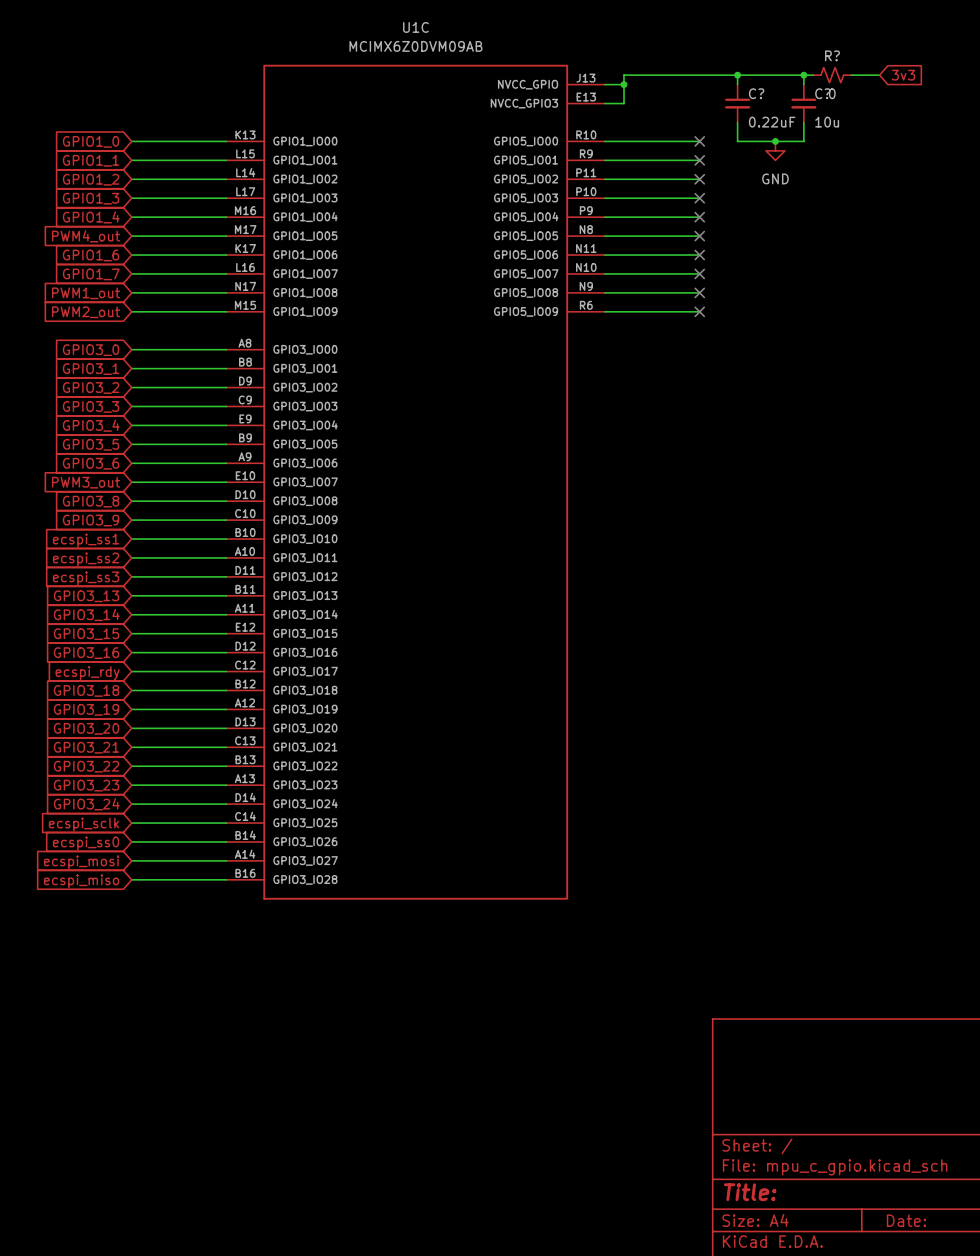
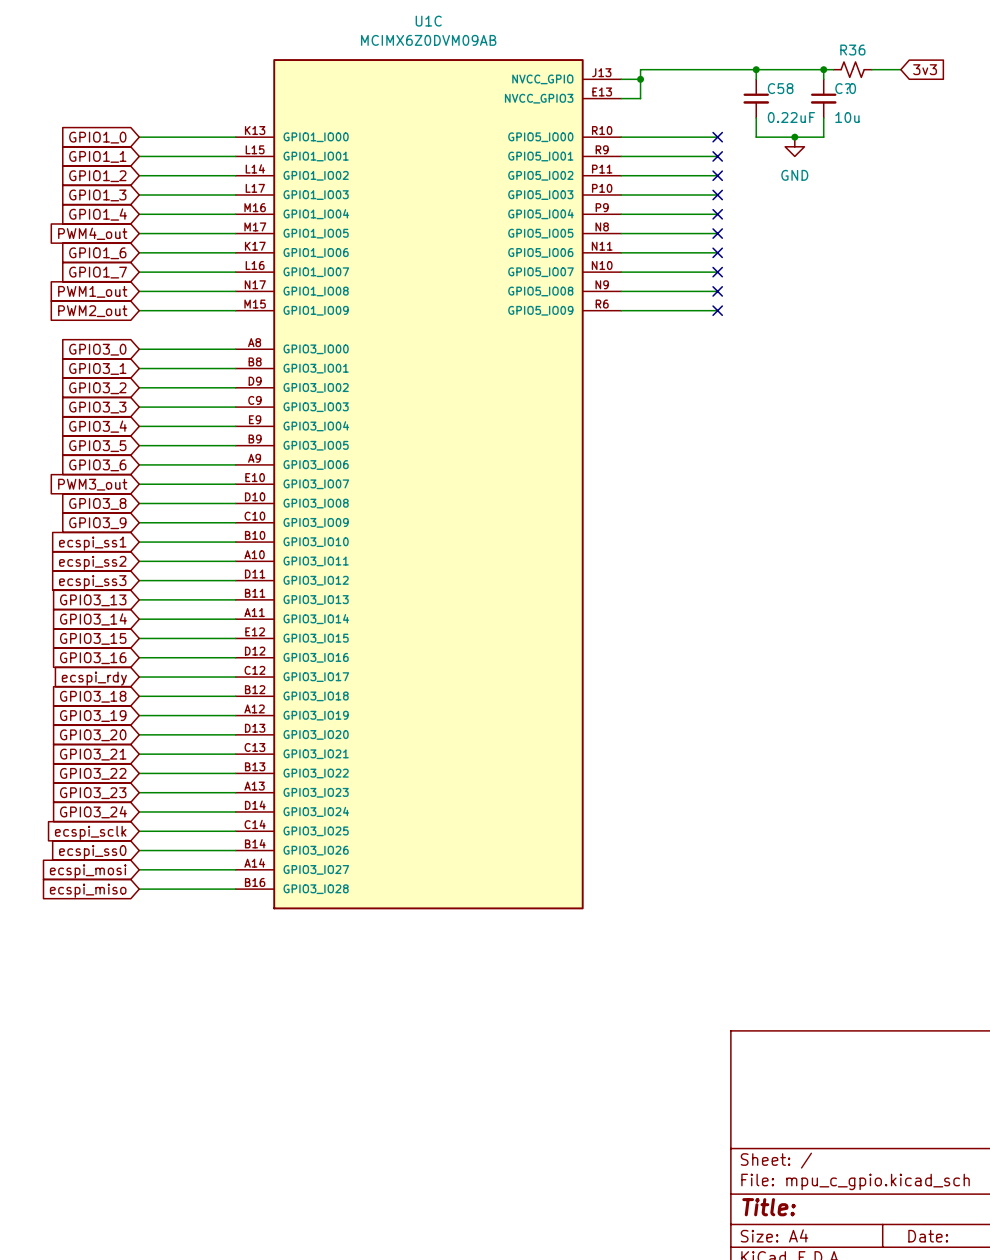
R? name: R? (832, 55) -> R36 (852, 50)
C? name: C? (756, 93) -> C58 (780, 88)

